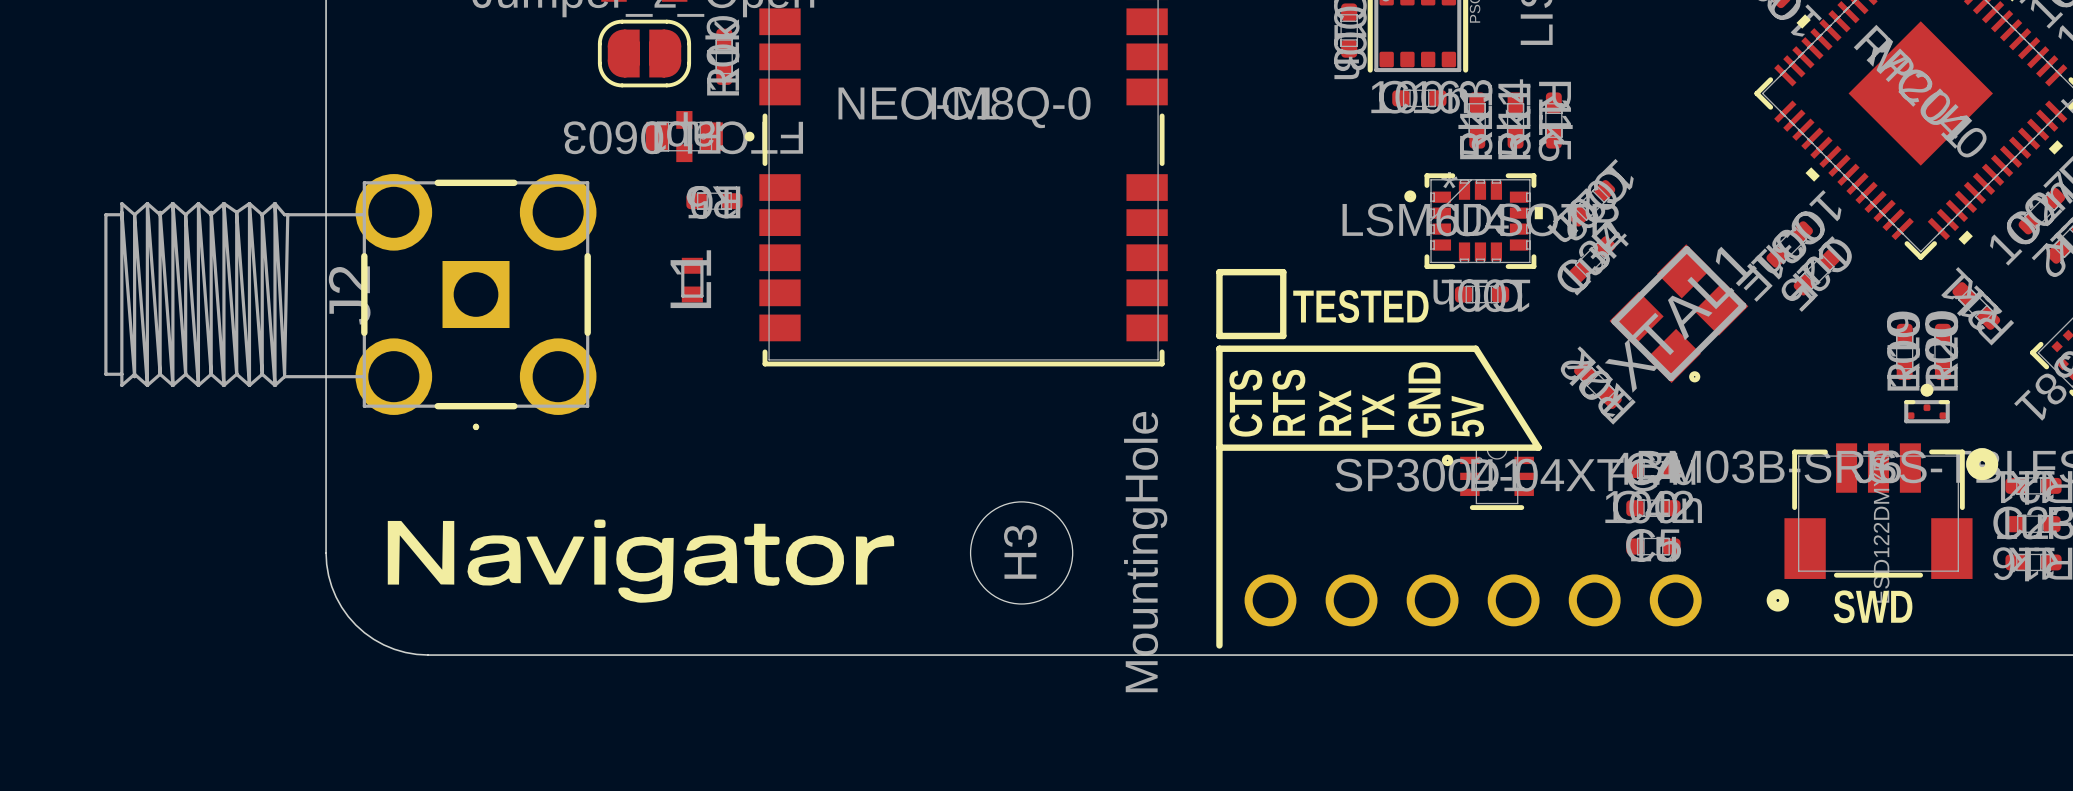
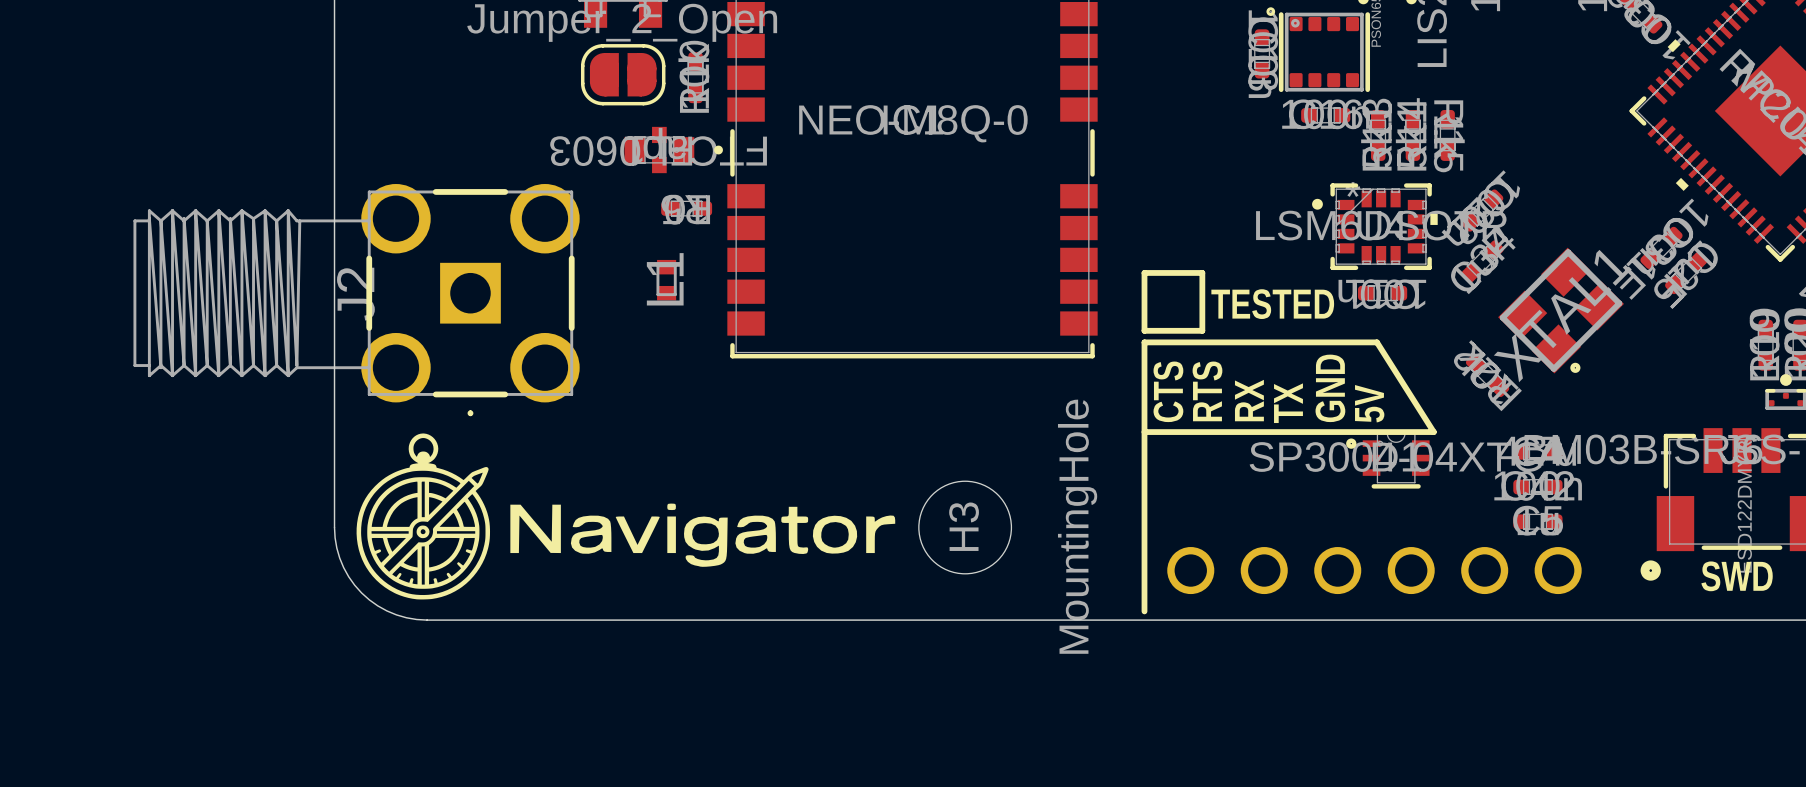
drawing: none -> [356, 433, 896, 600]
drawing: [387, 519, 895, 603] -> none

